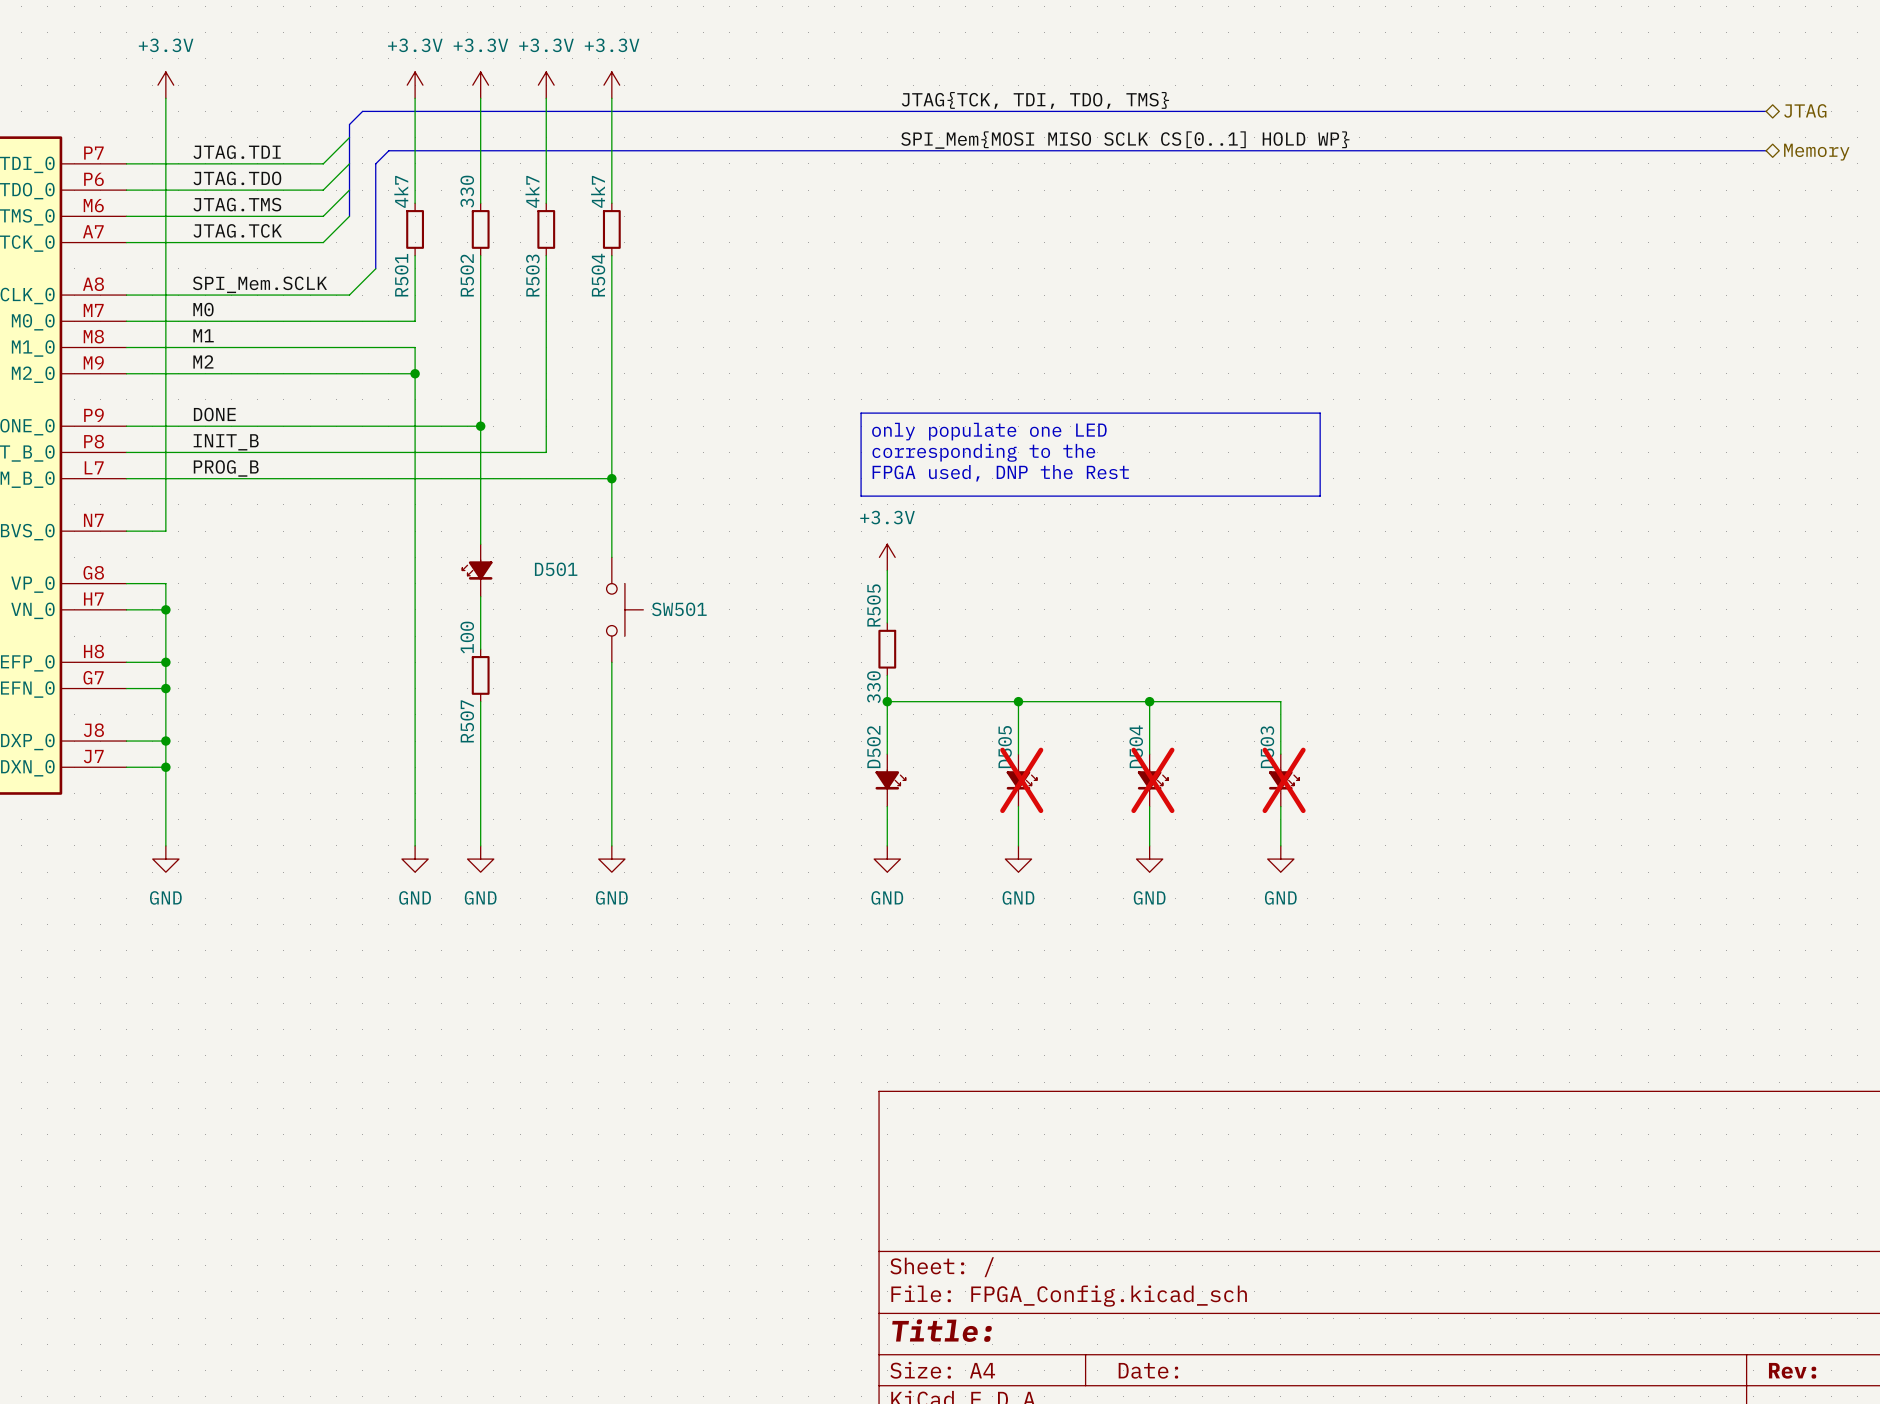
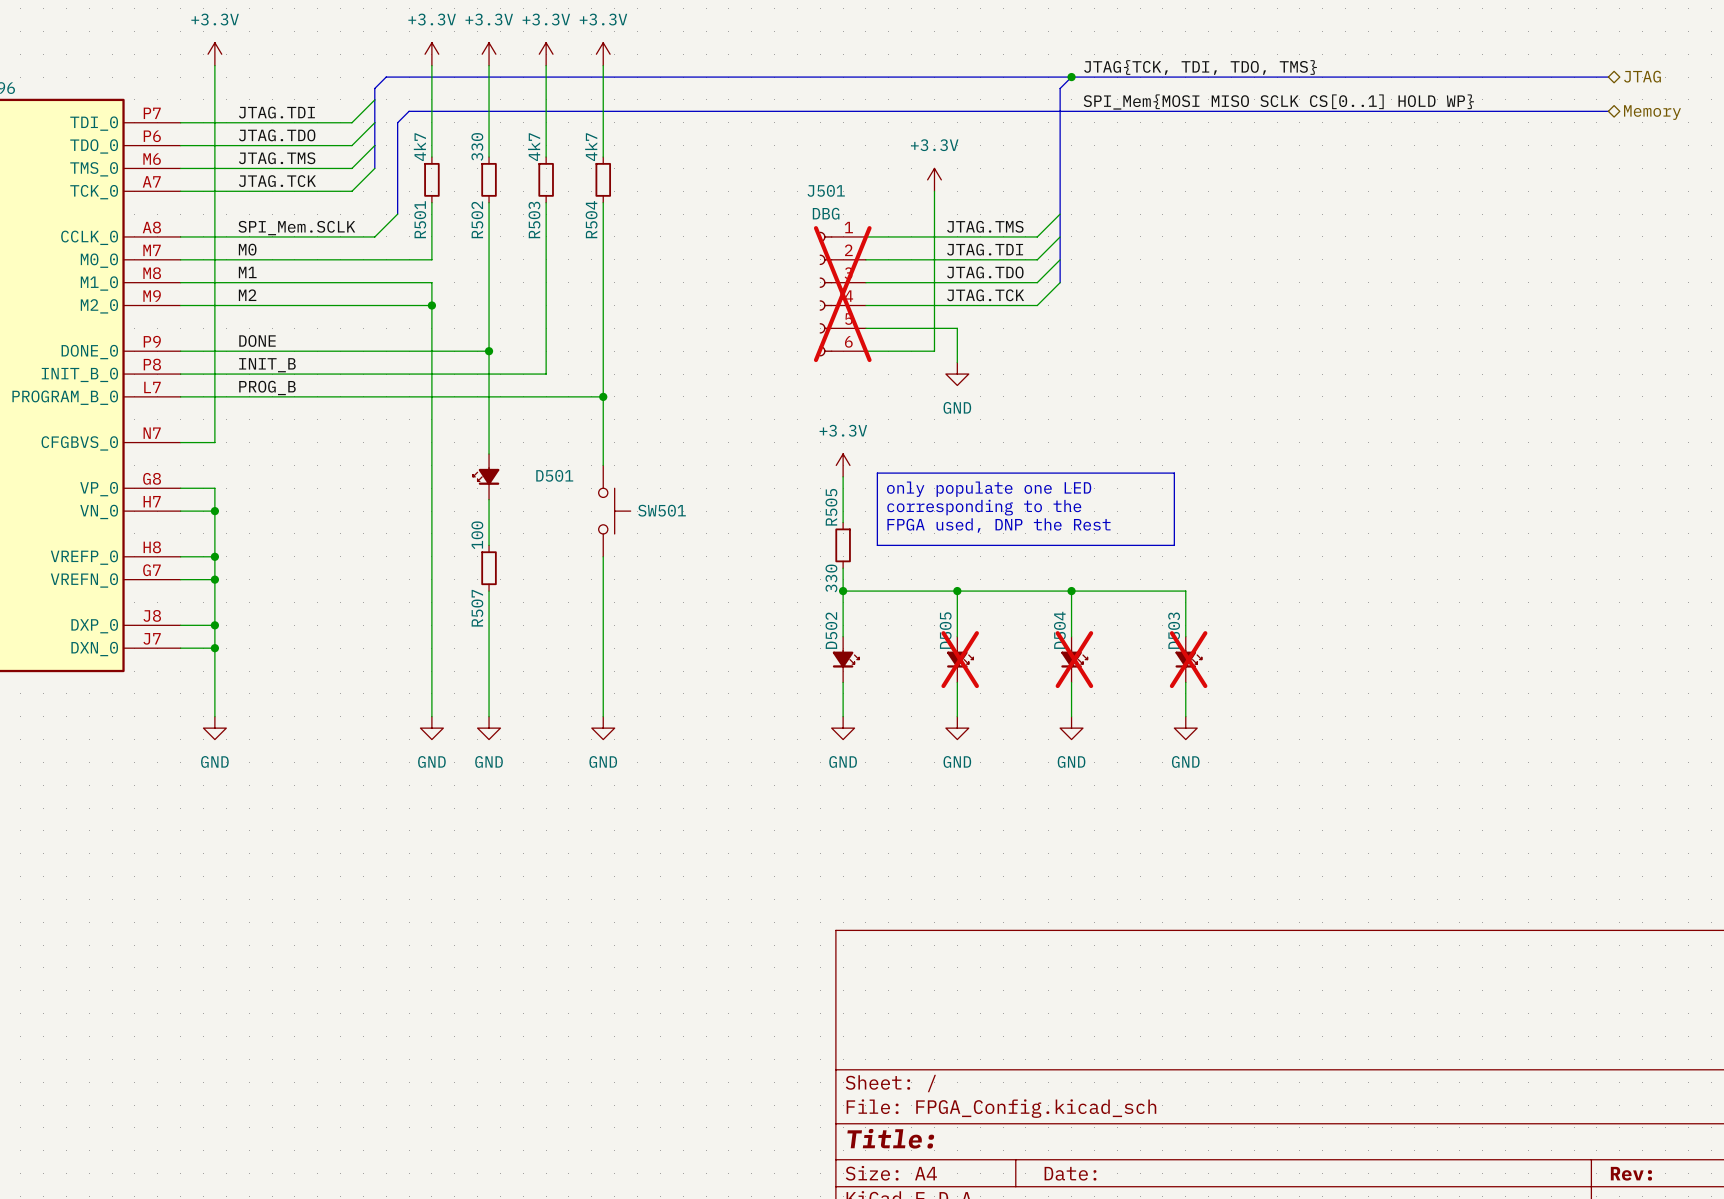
label: JTAG{TCK, TDI, TDO, TMS} (1035, 100) -> none
label: none -> JTAG{TCK, TDI, TDO, TMS} (1200, 67)
bus: none -> (1071, 77) (1060, 88) (1060, 282)
junction: none -> (1071, 77)
label: SPI_Mem{MOSI MISO SCLK CS[0..1] HOLD WP} (1125, 140) -> none
label: none -> SPI_Mem{MOSI MISO SCLK CS[0..1] HOLD WP} (1278, 102)
power symbol: none -> +3.3V (934, 179)
wire: none -> (934, 191) (934, 351) (865, 351)
wire: none -> (1060, 214) (1037, 236) (865, 236)
label: none -> JTAG.TMS (985, 226)
wire: none -> (1060, 236) (1037, 259) (865, 259)
label: none -> JTAG.TDI (985, 249)
wire: none -> (1060, 259) (1037, 282) (865, 282)
label: none -> JTAG.TDO (985, 272)
wire: none -> (1060, 282) (1037, 305) (865, 305)
J501: none -> DBG (842, 294)
label: none -> JTAG.TCK (985, 295)
wire: none -> (865, 328) (957, 328) (957, 362)
line: (861, 413) (1320, 413) (1320, 496) (861, 496) (861, 413) -> none
text position: only populate one LED (989, 431) -> only populate one LED (989, 489)
text position: corresponding to the (983, 452) -> corresponding to the (984, 507)
power symbol: none -> GND (957, 374)
text position: FPGA used, DNP the Rest (1000, 473) -> FPGA used, DNP the Rest (998, 525)
line: none -> (877, 473) (1174, 473) (1174, 545) (877, 545) (877, 473)

